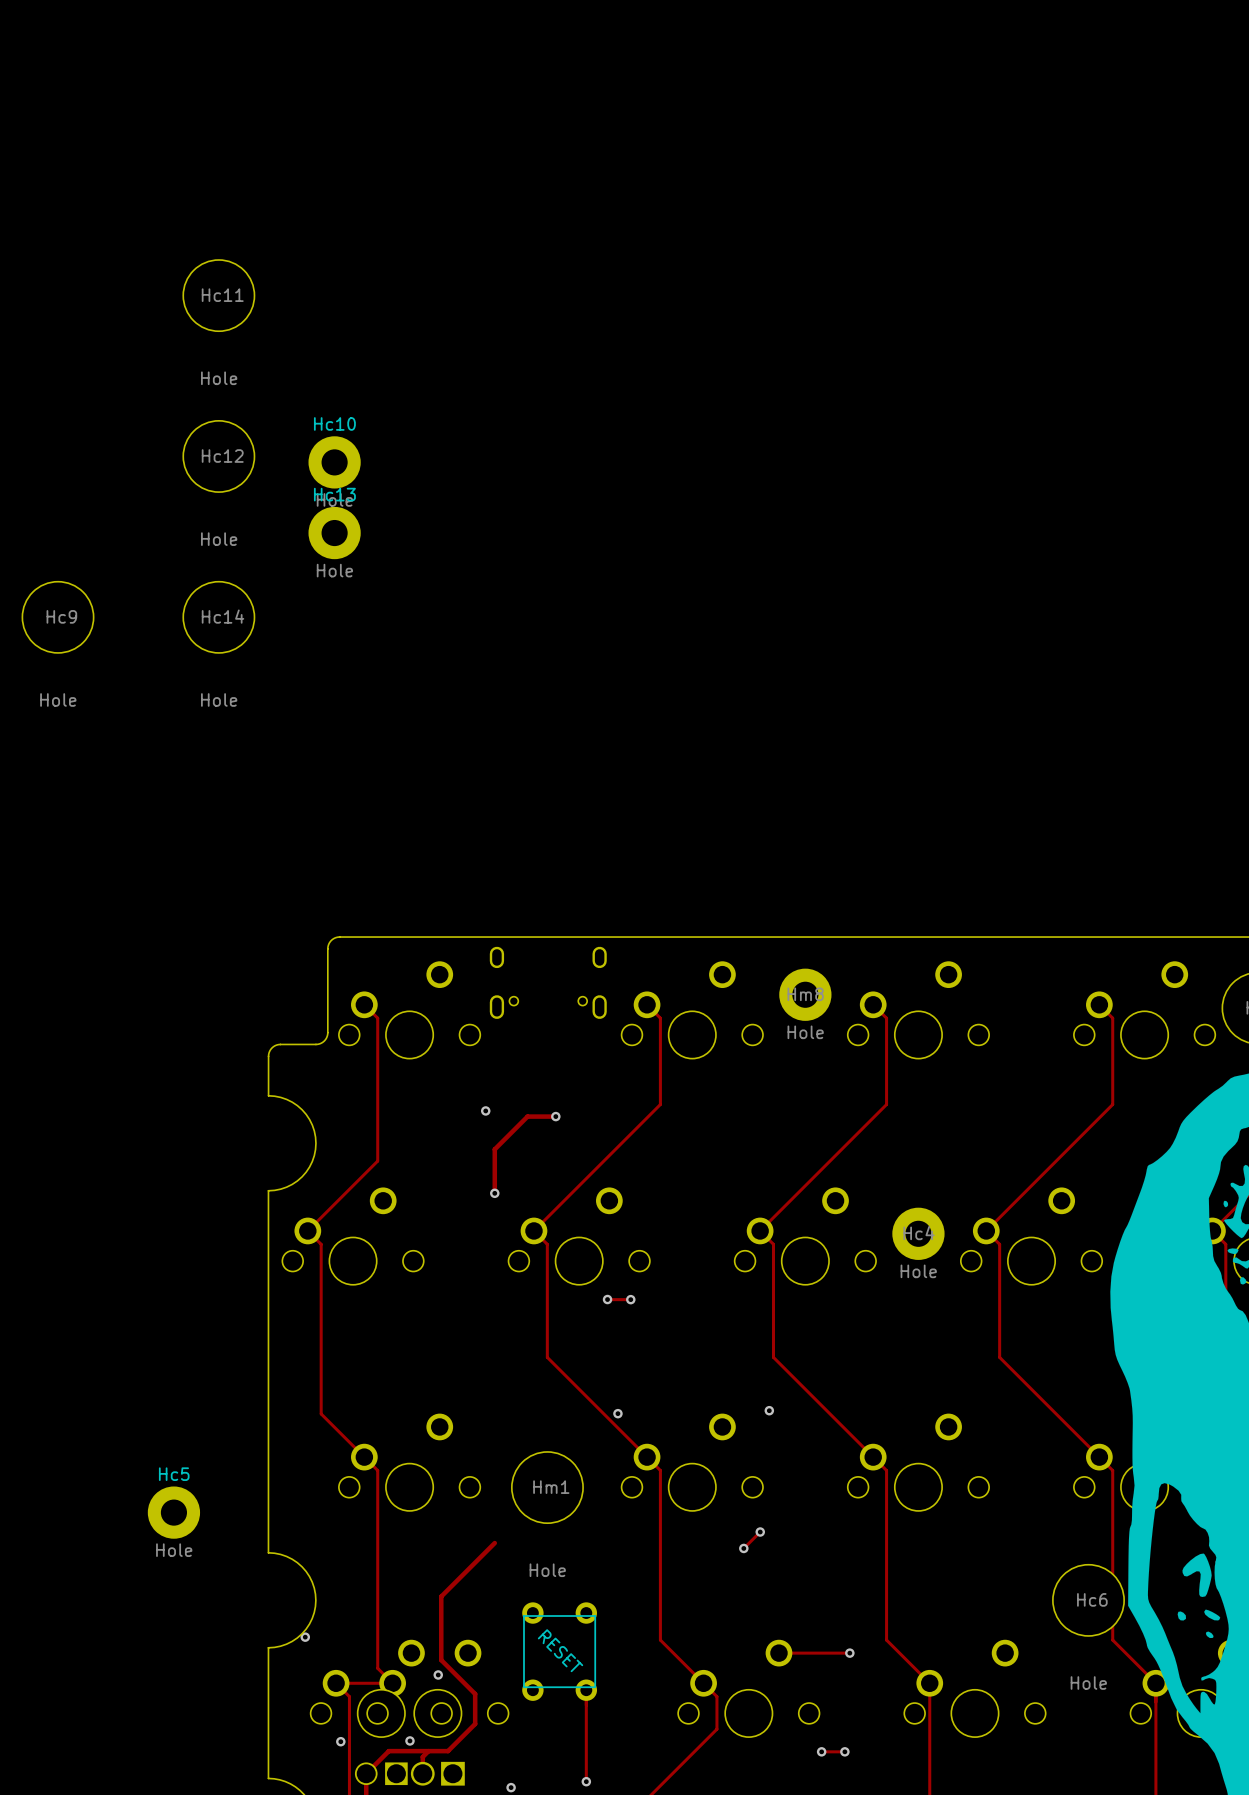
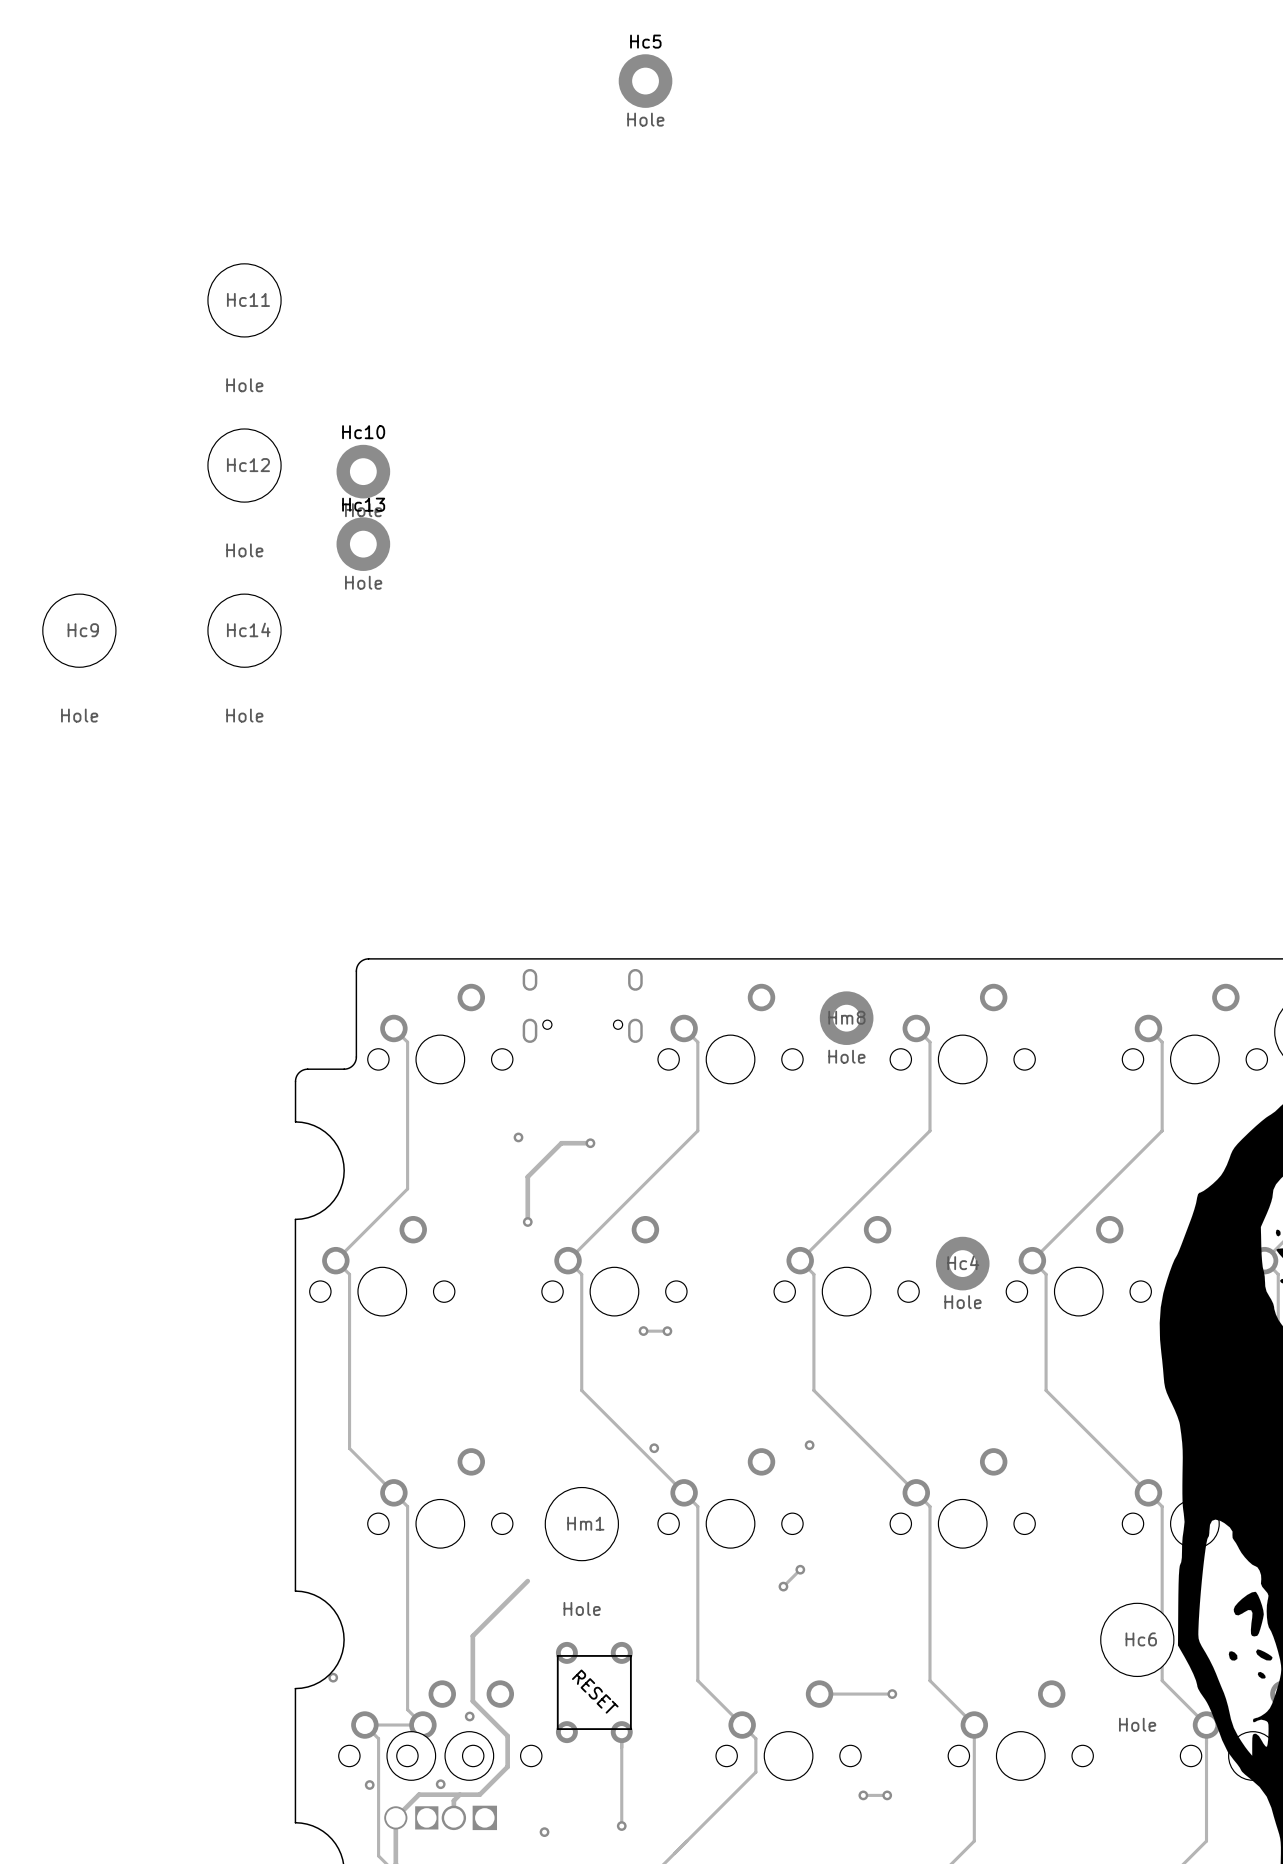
Hc5 position: (173, 1512) -> (645, 81)

